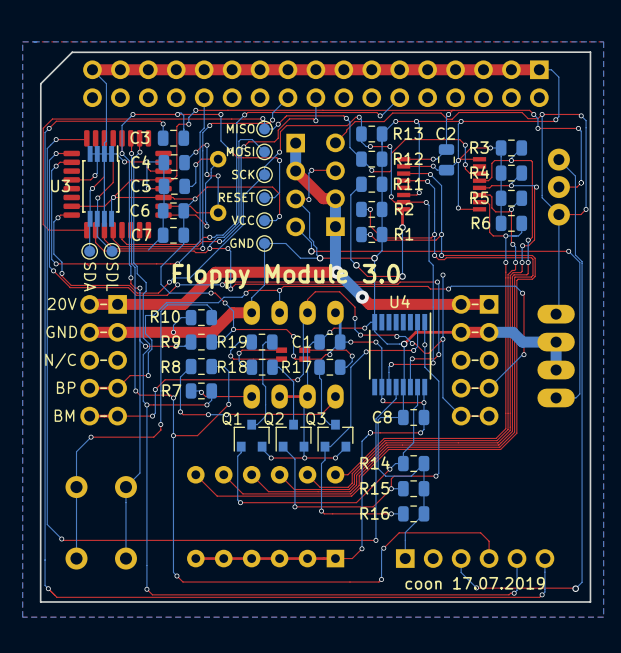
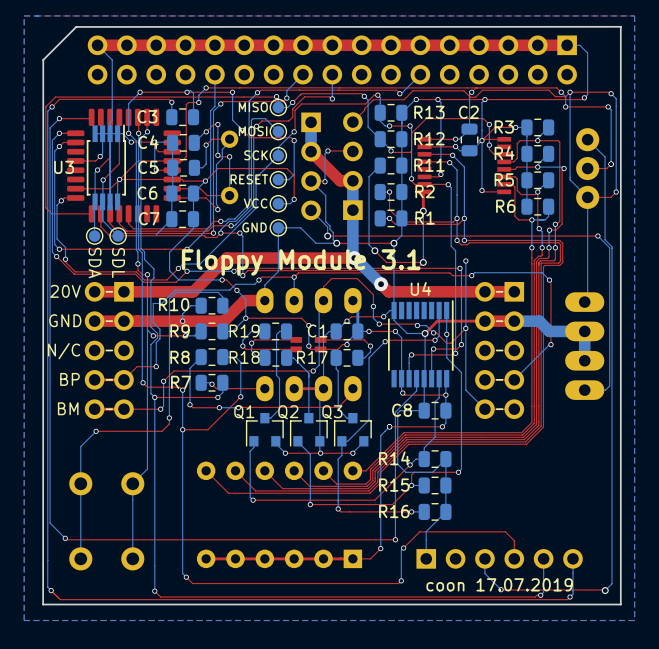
text: Floppy Module 3.0 (286, 276) -> Floppy Module 3.1 (301, 262)

